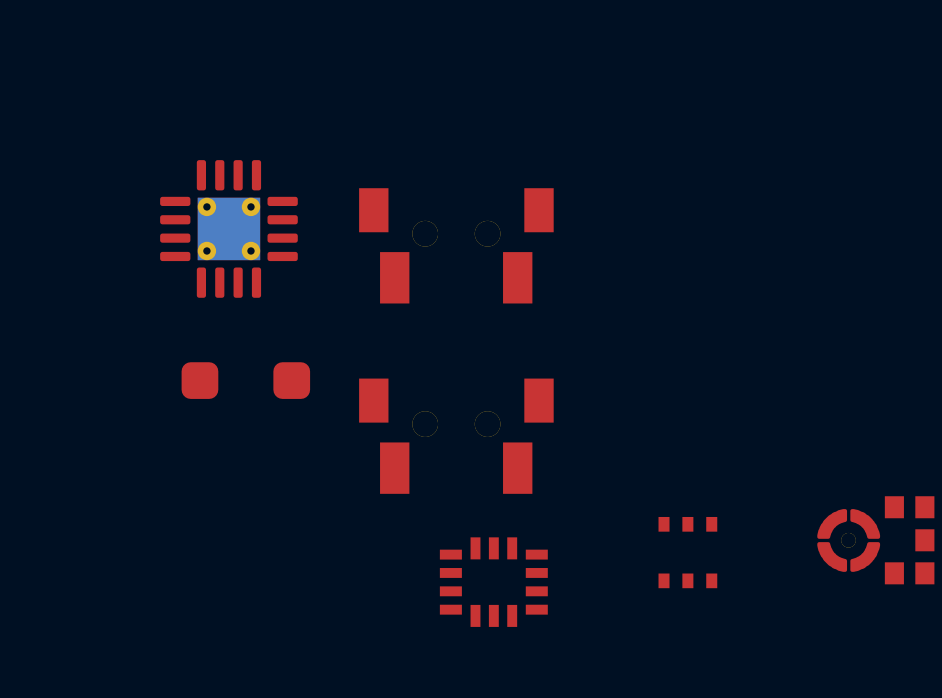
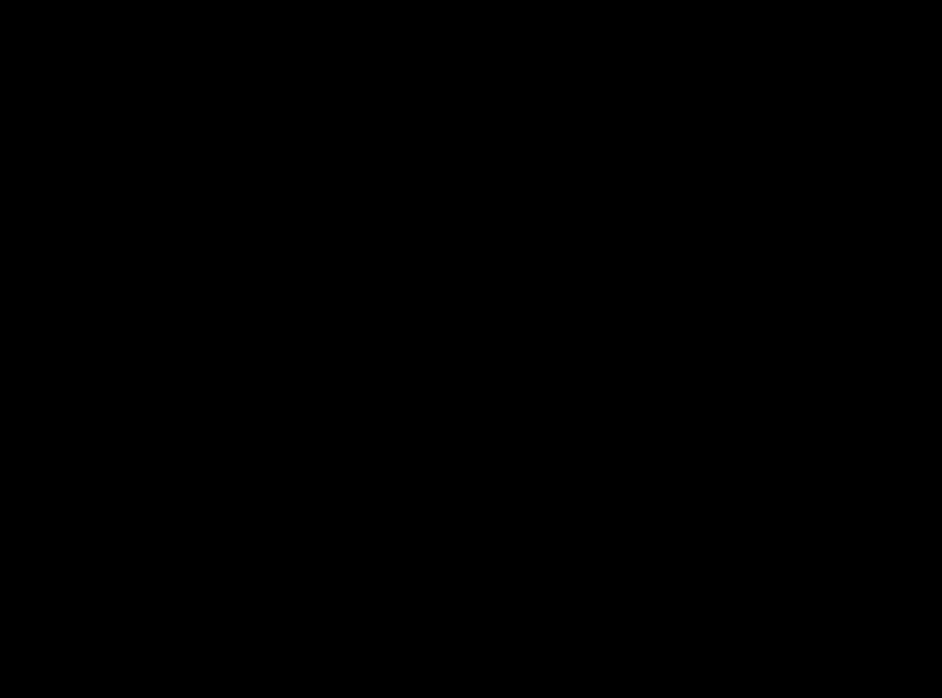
part: (228, 228) -> none
part: (456, 245) -> none
part: (245, 380) -> none
part: (456, 436) -> none
part: (875, 540) -> none
part: (687, 552) -> none
part: (493, 582) -> none

